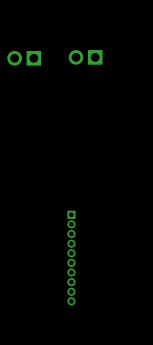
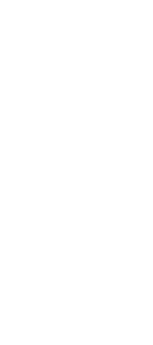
part: (85, 57) -> none
part: (24, 58) -> none
part: (71, 258) -> none

